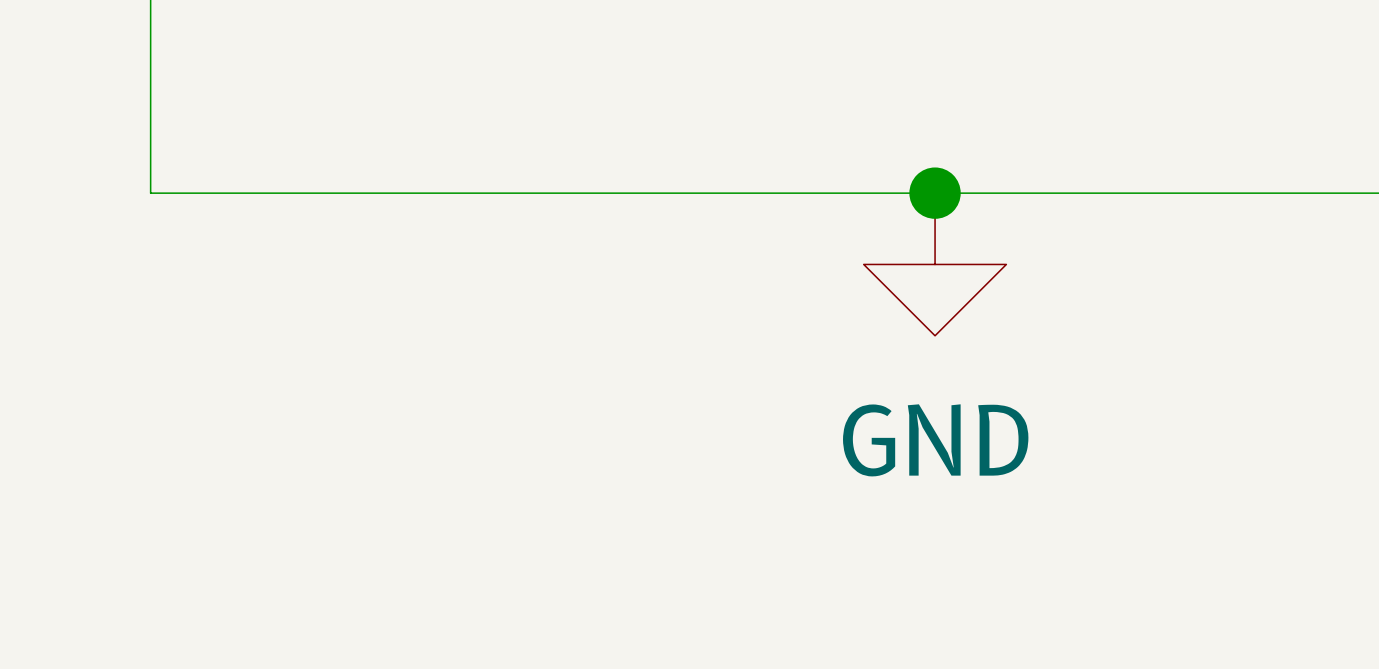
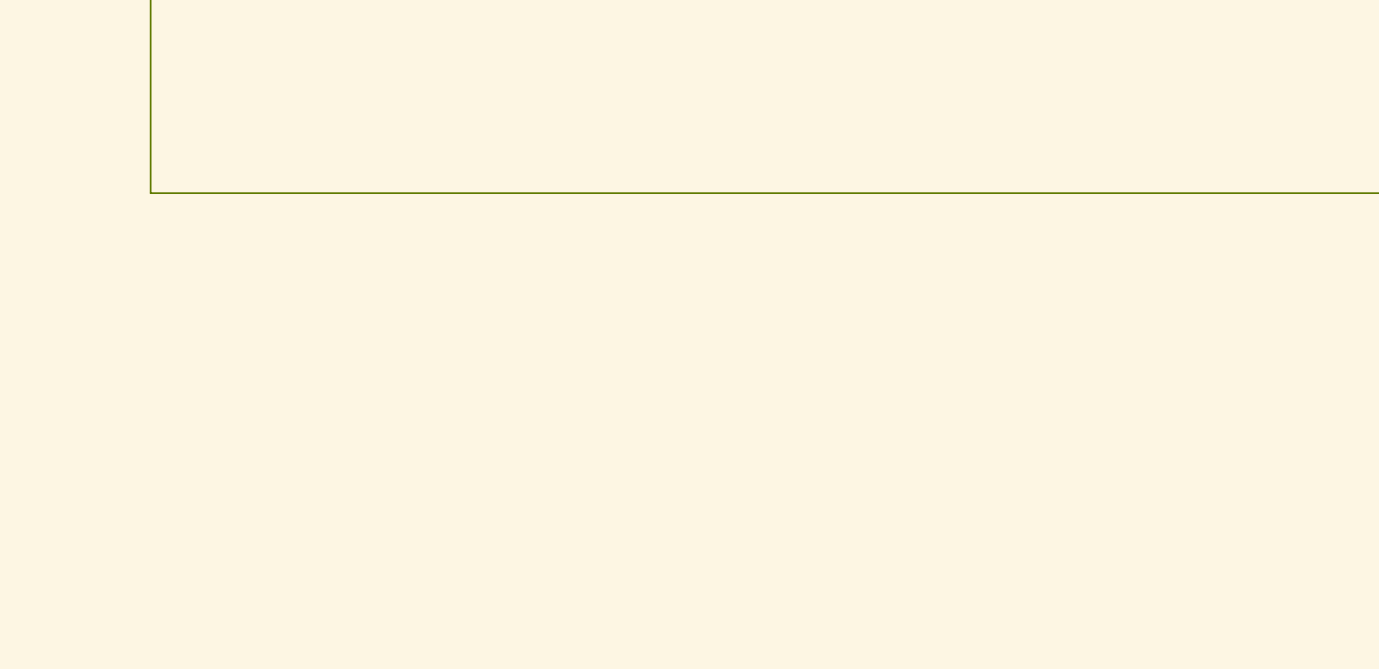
junction: (935, 193) -> none
power symbol: GND (935, 264) -> none

